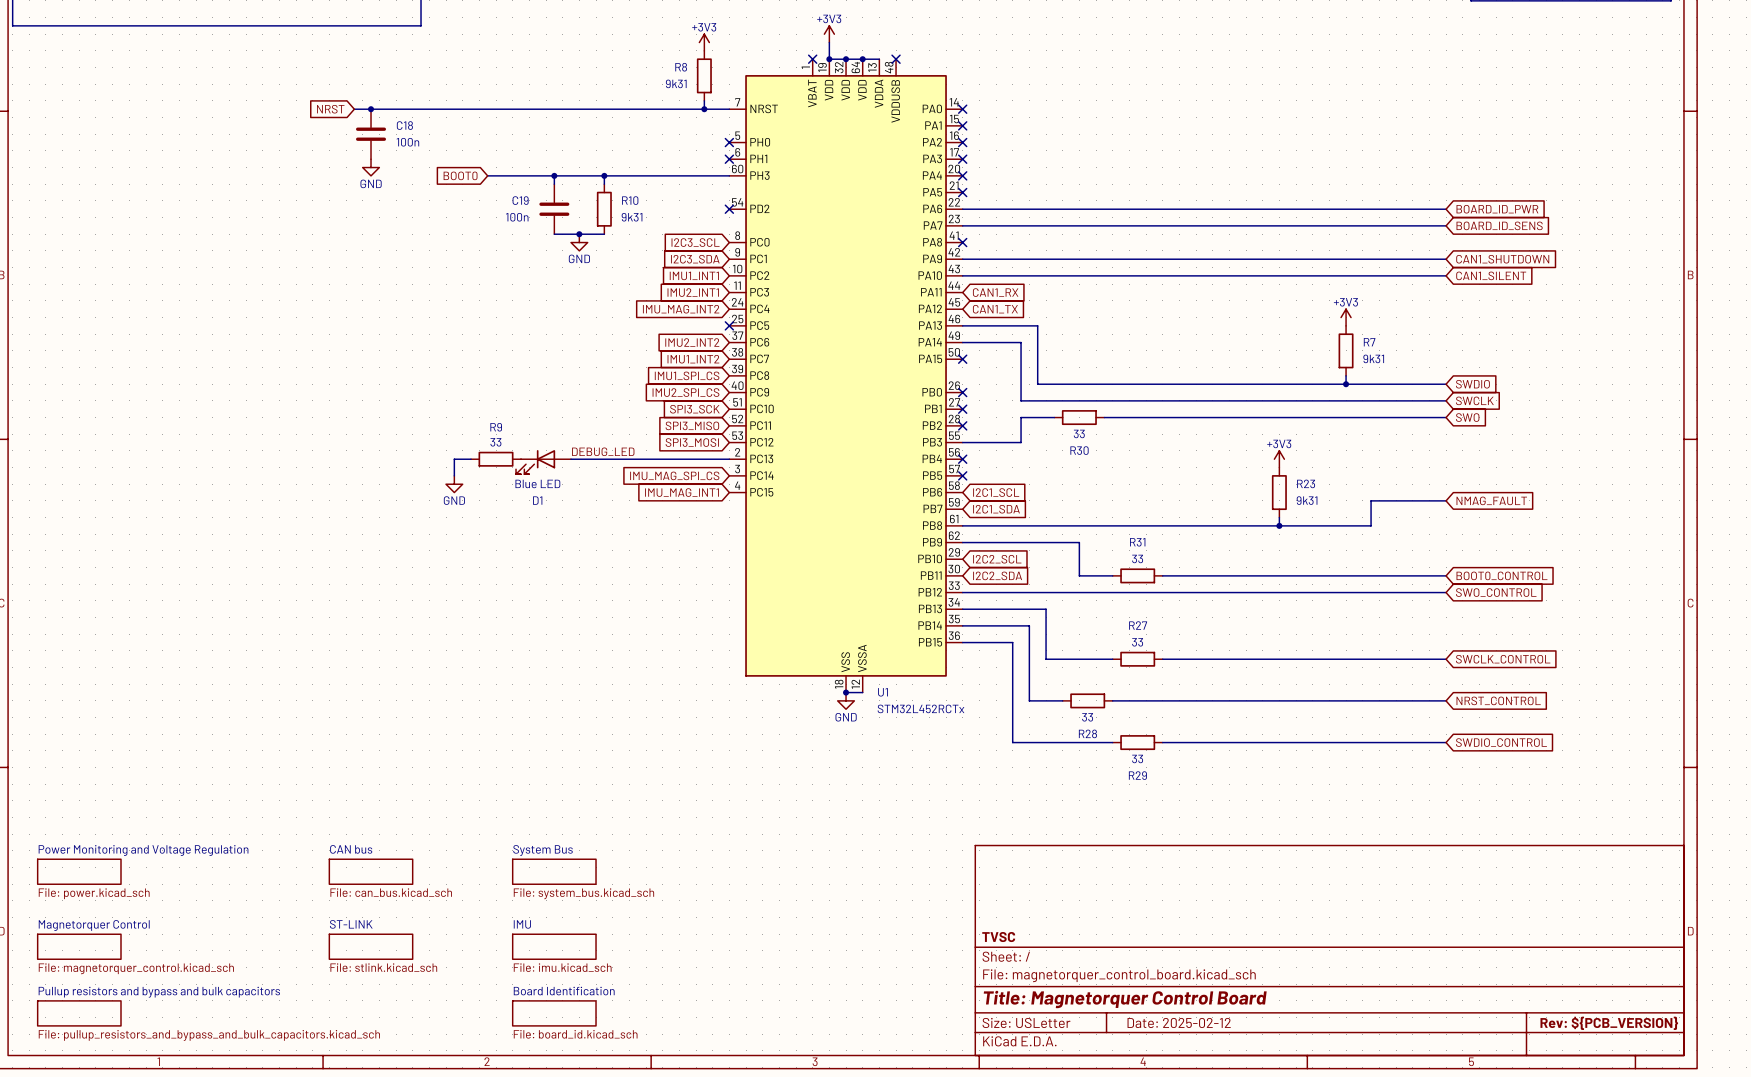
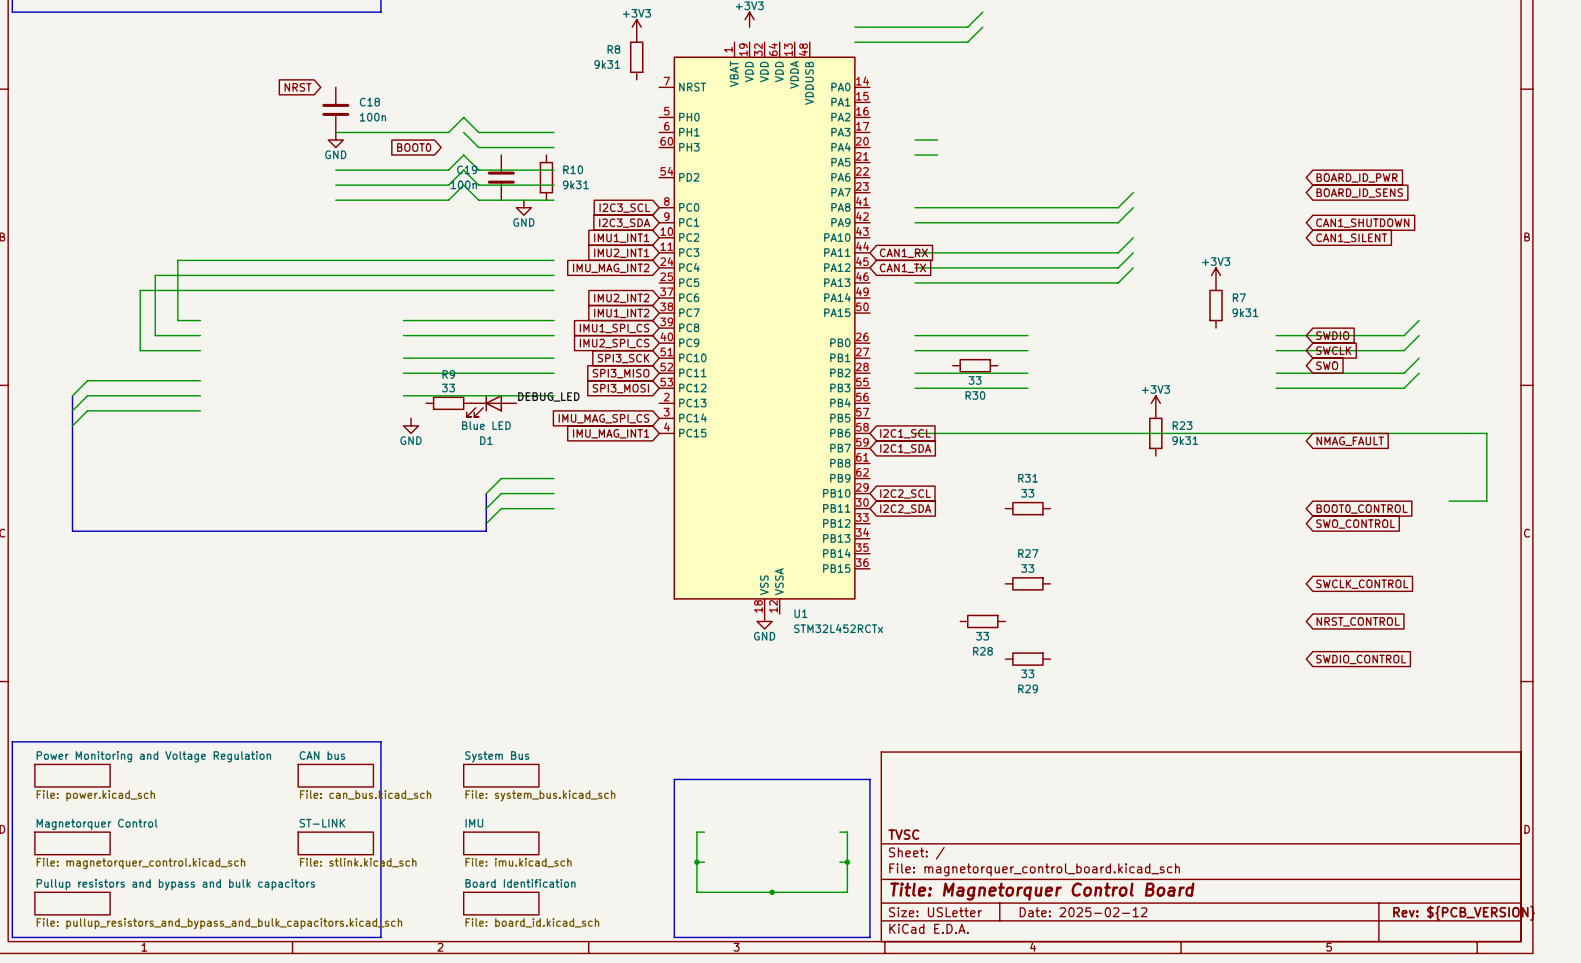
wire: none -> (982, 12) (967, 27) (854, 27)
wire: (829, 42) (829, 59) (879, 59) -> none
wire: none -> (982, 27) (967, 42) (854, 42)
no-connect mark: (812, 59) -> none
junction: (829, 59) -> none
junction: (846, 59) -> none
junction: (862, 59) -> none
no-connect mark: (896, 59) -> none
wire: (704, 100) (704, 109) -> none
wire: (354, 109) (729, 109) -> none
junction: (371, 109) -> none
junction: (704, 109) -> none
no-connect mark: (962, 109) -> none
no-connect mark: (962, 125) -> none
no-connect mark: (729, 142) -> none
no-connect mark: (962, 142) -> none
wire: none -> (335, 132) (448, 132) (463, 117) (478, 132) (553, 132)
no-connect mark: (729, 159) -> none
no-connect mark: (962, 159) -> none
wire: none -> (915, 140) (937, 140)
wire: (487, 175) (529, 175) -> (463, 132) (478, 147)
wire: (554, 175) (554, 184) -> none
junction: (554, 175) -> none
wire: (604, 175) (604, 184) -> none
junction: (604, 175) -> none
wire: (612, 175) (729, 175) -> none
no-connect mark: (962, 175) -> none
wire: none -> (915, 155) (937, 155)
no-connect mark: (962, 192) -> none
wire: none -> (335, 170) (448, 170) (463, 155) (478, 170) (553, 170)
no-connect mark: (729, 209) -> none
wire: (962, 209) (1446, 209) -> none
wire: none -> (335, 185) (448, 185) (463, 170) (478, 185) (553, 185)
wire: (962, 225) (1446, 225) -> none
wire: none -> (1133, 192) (1118, 207) (915, 207)
wire: none -> (335, 200) (448, 200) (463, 185) (478, 200) (501, 200)
junction: (579, 234) -> none
wire: none -> (546, 200) (553, 200)
no-connect mark: (962, 242) -> none
wire: (962, 259) (1012, 259) -> none
wire: (1237, 259) (1446, 259) -> (1118, 222) (1133, 207)
wire: (962, 275) (1446, 275) -> none
wire: none -> (1133, 237) (1118, 252) (915, 252)
wire: none -> (1133, 252) (1118, 267) (915, 267)
wire: none -> (553, 260) (177, 260) (177, 320) (200, 320)
wire: none -> (1133, 267) (1118, 282) (937, 282)
wire: none -> (553, 275) (155, 275) (155, 335) (200, 335)
no-connect mark: (729, 325) -> none
wire: (962, 325) (1012, 325) -> none
wire: (1037, 325) (1037, 384) -> (915, 335) (937, 335)
wire: none -> (553, 290) (140, 290) (140, 350) (200, 350)
wire: (962, 342) (1021, 342) (1021, 400) -> (915, 350) (922, 350)
no-connect mark: (962, 359) -> none
wire: none -> (403, 320) (553, 320)
wire: none -> (1419, 320) (1404, 335) (1306, 335)
wire: (1346, 375) (1346, 384) -> none
wire: none -> (403, 335) (553, 335)
wire: (1137, 384) (1412, 384) -> none
junction: (1346, 384) -> none
wire: none -> (1419, 335) (1404, 350) (1306, 350)
no-connect mark: (962, 392) -> none
wire: (1137, 400) (1412, 400) -> none
wire: none -> (403, 358) (553, 358)
no-connect mark: (962, 409) -> none
wire: none -> (1419, 358) (1404, 373) (1276, 373)
wire: (1054, 417) (1021, 417) (1021, 442) -> (1027, 388) (922, 388)
wire: (1104, 417) (1446, 417) -> none
wire: none -> (403, 373) (553, 373)
no-connect mark: (962, 425) -> none
wire: none -> (915, 373) (1027, 373)
wire: none -> (1419, 373) (1404, 388) (1276, 388)
wire: none -> (200, 380) (87, 380) (72, 395)
wire: (962, 442) (1012, 442) -> none
bus: none -> (72, 395) (72, 531) (486, 531) (486, 493)
wire: none -> (200, 395) (87, 395) (72, 410)
wire: none -> (403, 395) (553, 395)
wire: (471, 459) (454, 459) (454, 475) -> none
wire: (571, 459) (729, 459) -> none
no-connect mark: (962, 459) -> none
wire: none -> (200, 410) (87, 410) (72, 425)
no-connect mark: (962, 475) -> none
wire: none -> (915, 433) (1486, 433) (1486, 501) (1449, 501)
wire: (1446, 500) (1371, 500) (1371, 525) (962, 525) -> none
wire: (1279, 517) (1279, 525) -> none
junction: (1279, 525) -> none
wire: none -> (553, 478) (501, 478) (486, 493)
wire: (962, 542) (1079, 542) (1079, 575) (1112, 575) -> none
wire: none -> (553, 493) (501, 493) (486, 508)
wire: none -> (553, 508) (501, 508) (486, 523)
wire: (1162, 575) (1446, 575) -> none
wire: (962, 592) (1446, 592) -> none
wire: (962, 609) (1046, 609) (1046, 659) (1112, 659) -> none
wire: (962, 625) (1029, 625) (1029, 700) (1062, 700) -> none
wire: (962, 642) (1012, 642) (1012, 742) (1112, 742) -> none
wire: (1162, 659) (1446, 659) -> none
wire: (846, 692) (862, 692) -> none
junction: (846, 692) -> none
wire: (1112, 700) (1446, 700) -> none
wire: (1162, 742) (1446, 742) -> none
line: none -> (12, 741) (380, 741) (380, 937) (12, 937) (12, 741)
line: none -> (674, 779) (869, 779) (869, 937) (674, 937) (674, 779)
wire: none -> (704, 832) (696, 832) (696, 892) (847, 892) (847, 832) (839, 832)
wire: none -> (696, 862) (704, 862)
junction: none -> (696, 862)
wire: none -> (839, 862) (847, 862)
junction: none -> (847, 862)
junction: none -> (772, 892)

